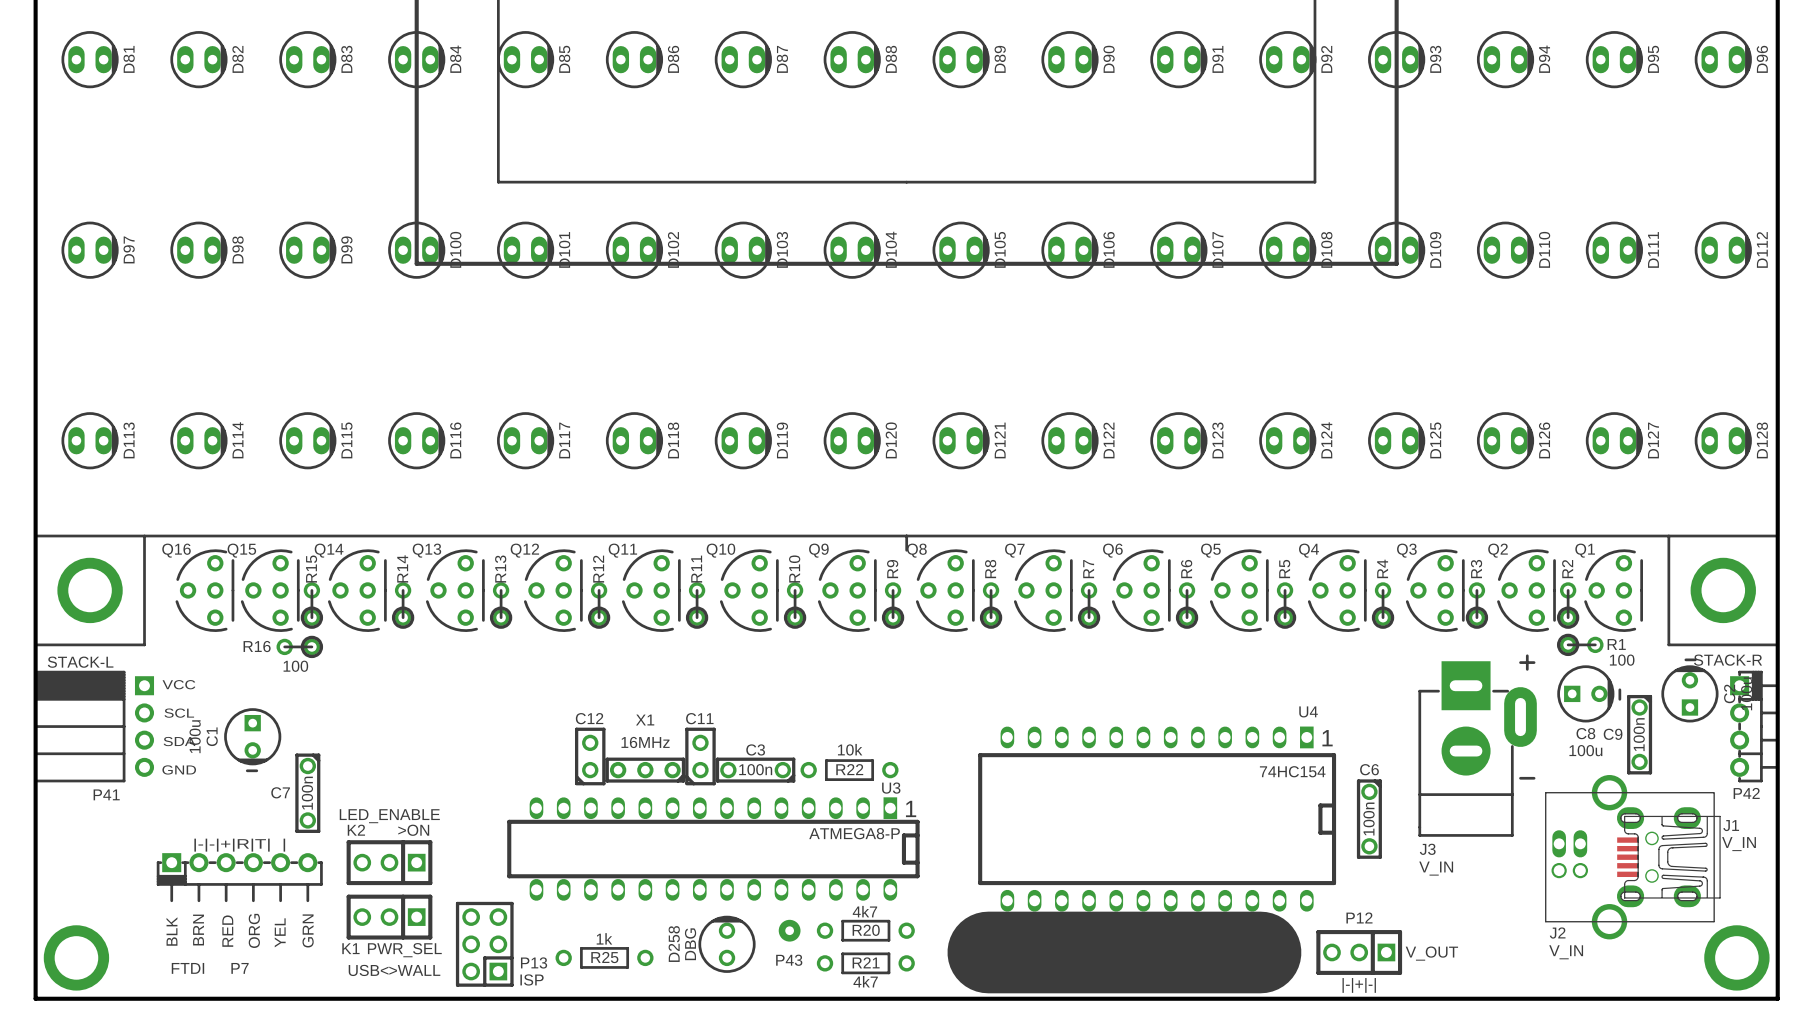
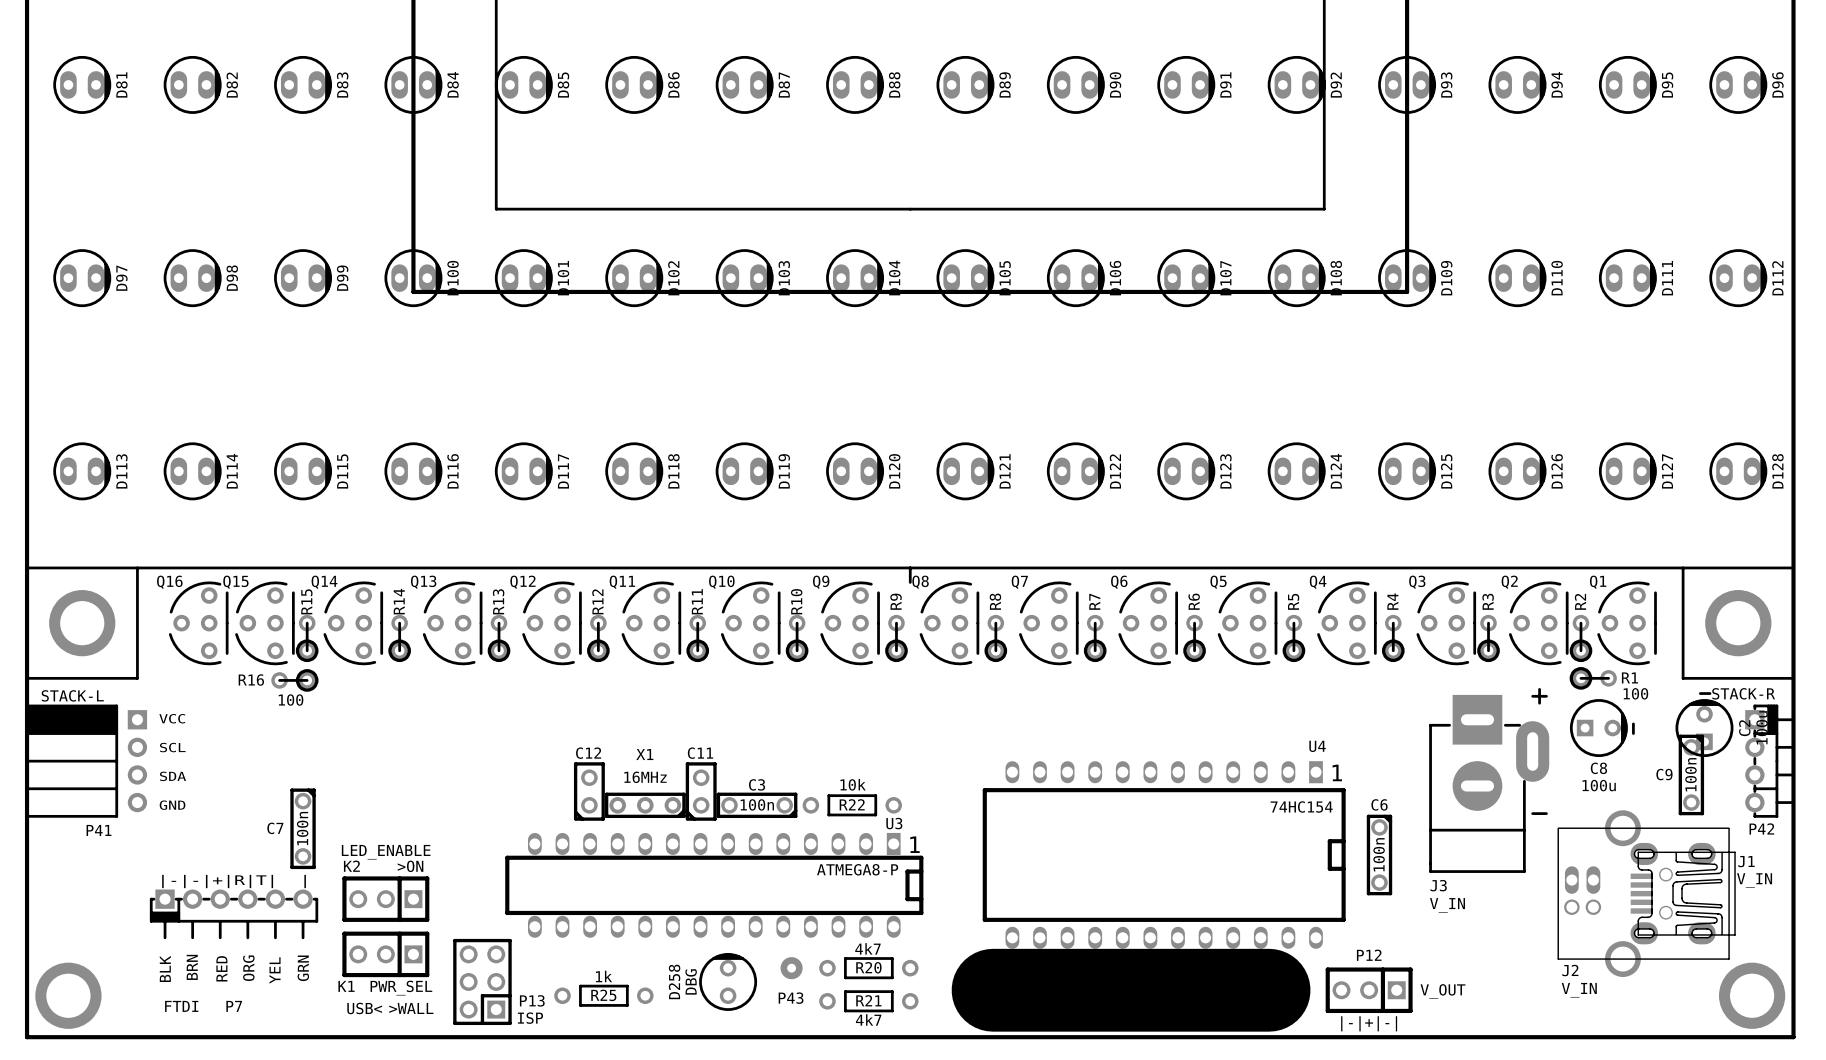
C9 position: (1639, 734) -> (1691, 774)
C1: 100u (252, 740) -> none

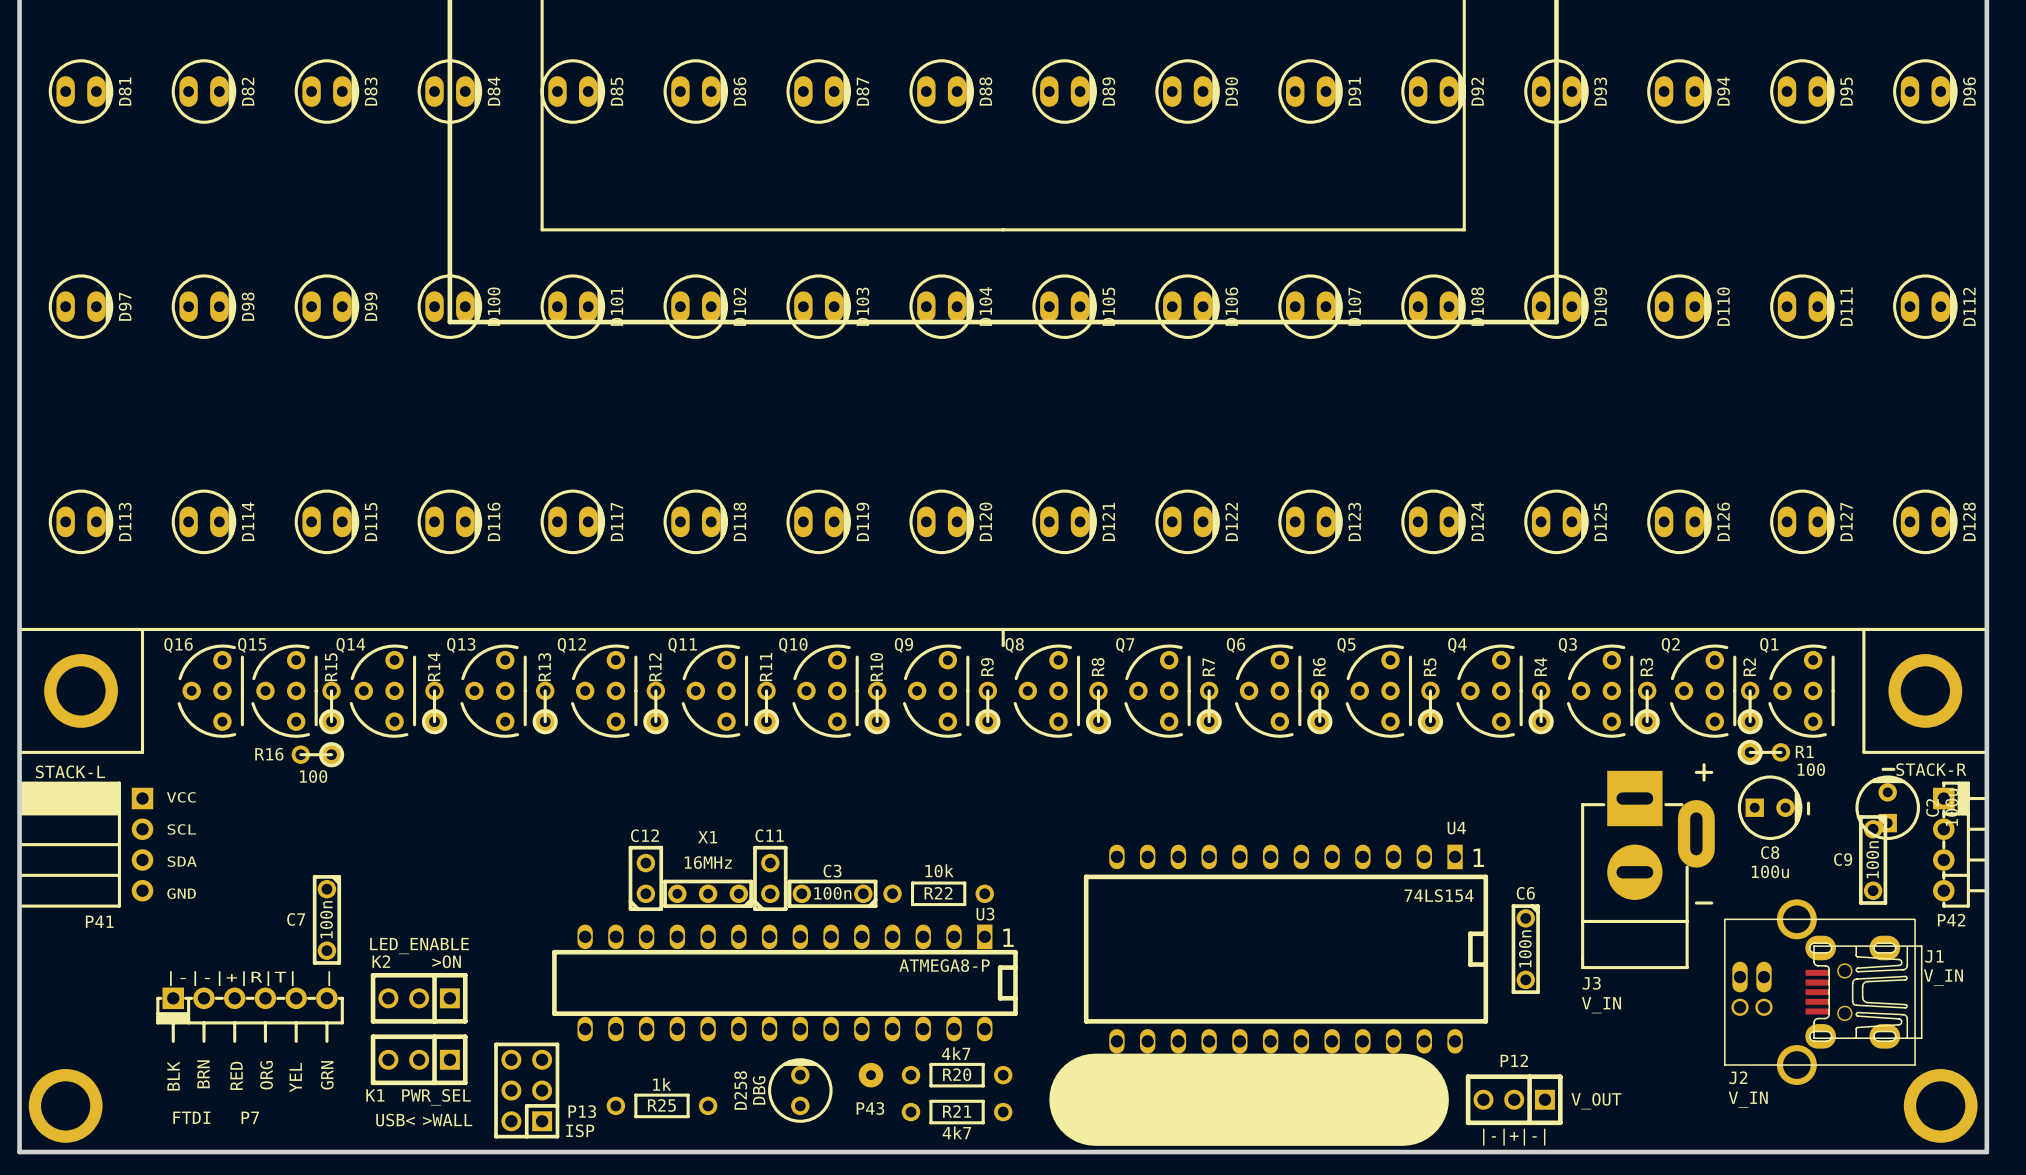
U4 value: 74HC154 (1301, 806) -> 74LS154 (1439, 895)

